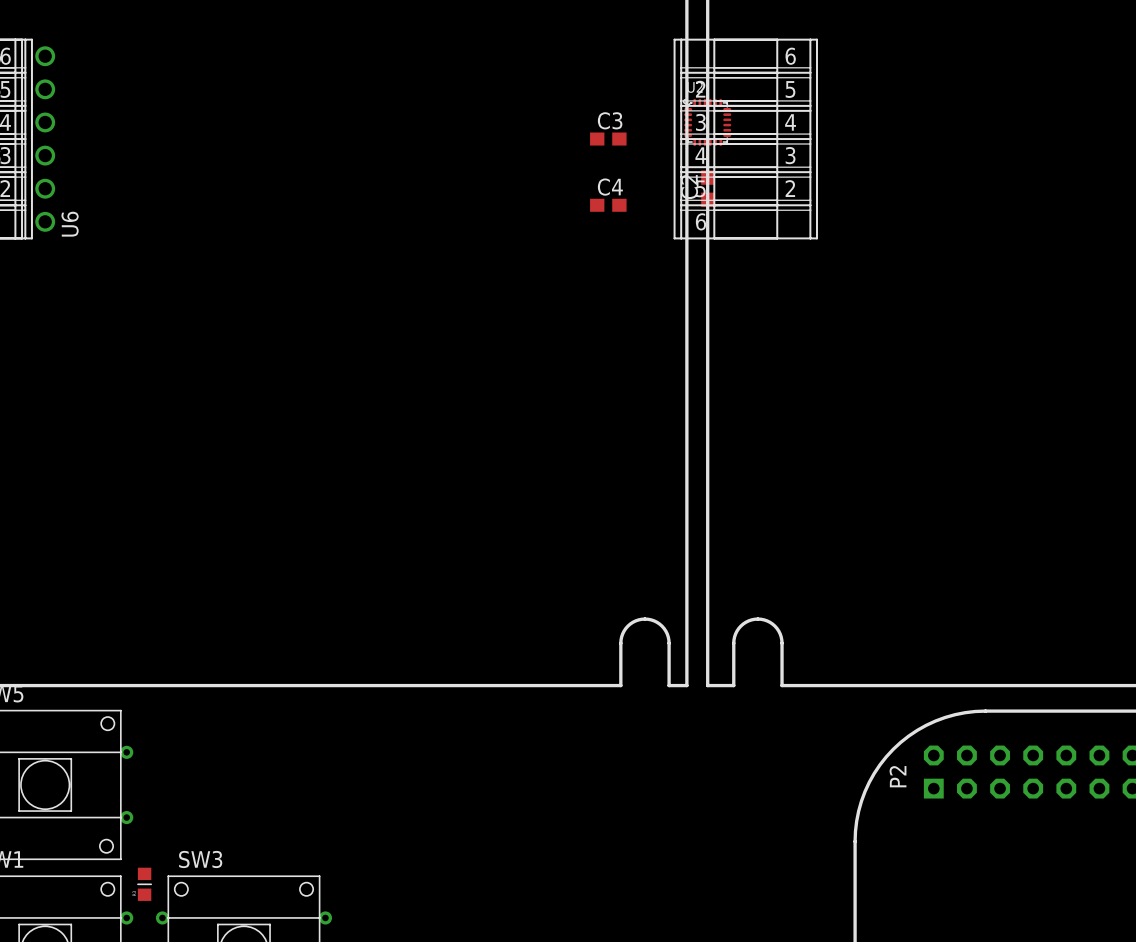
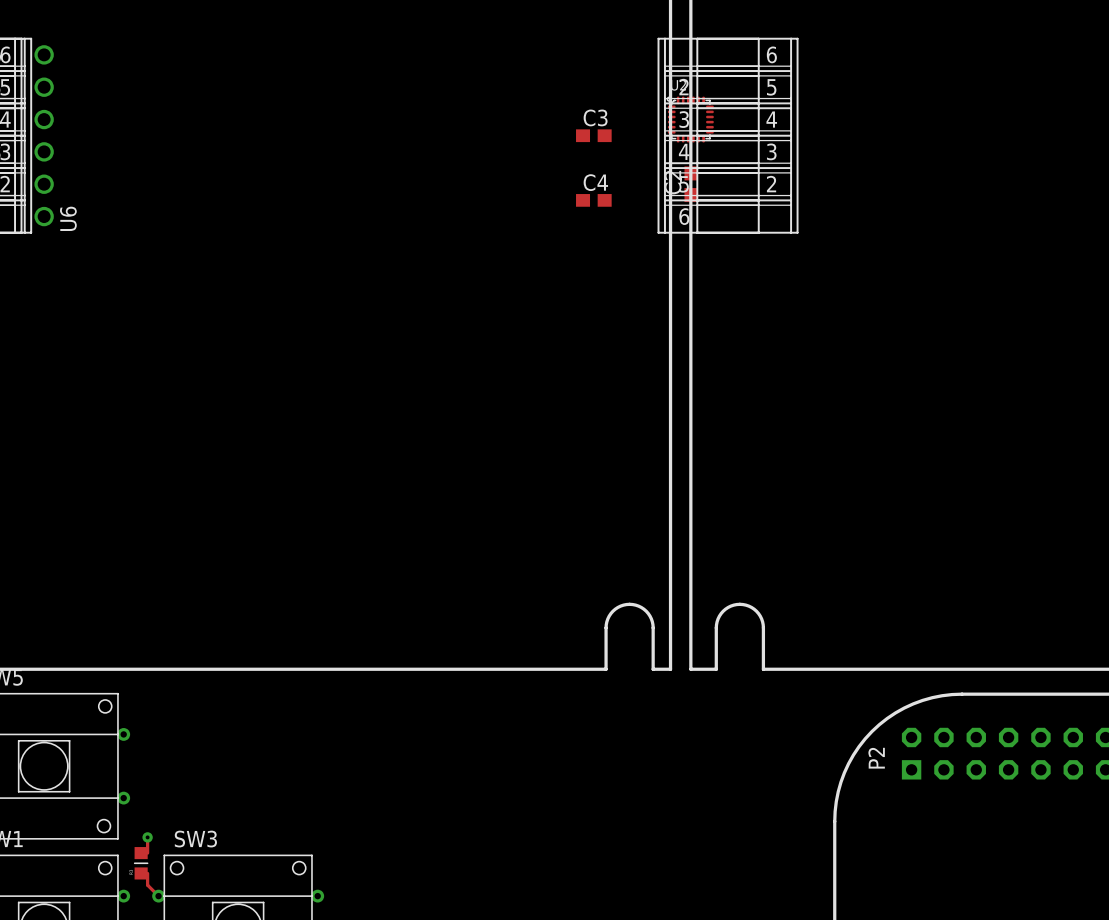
top track: none -> (147, 837) (147, 853)
via: none -> (147, 837)
top track: none -> (147, 873) (147, 885) (158, 896)

